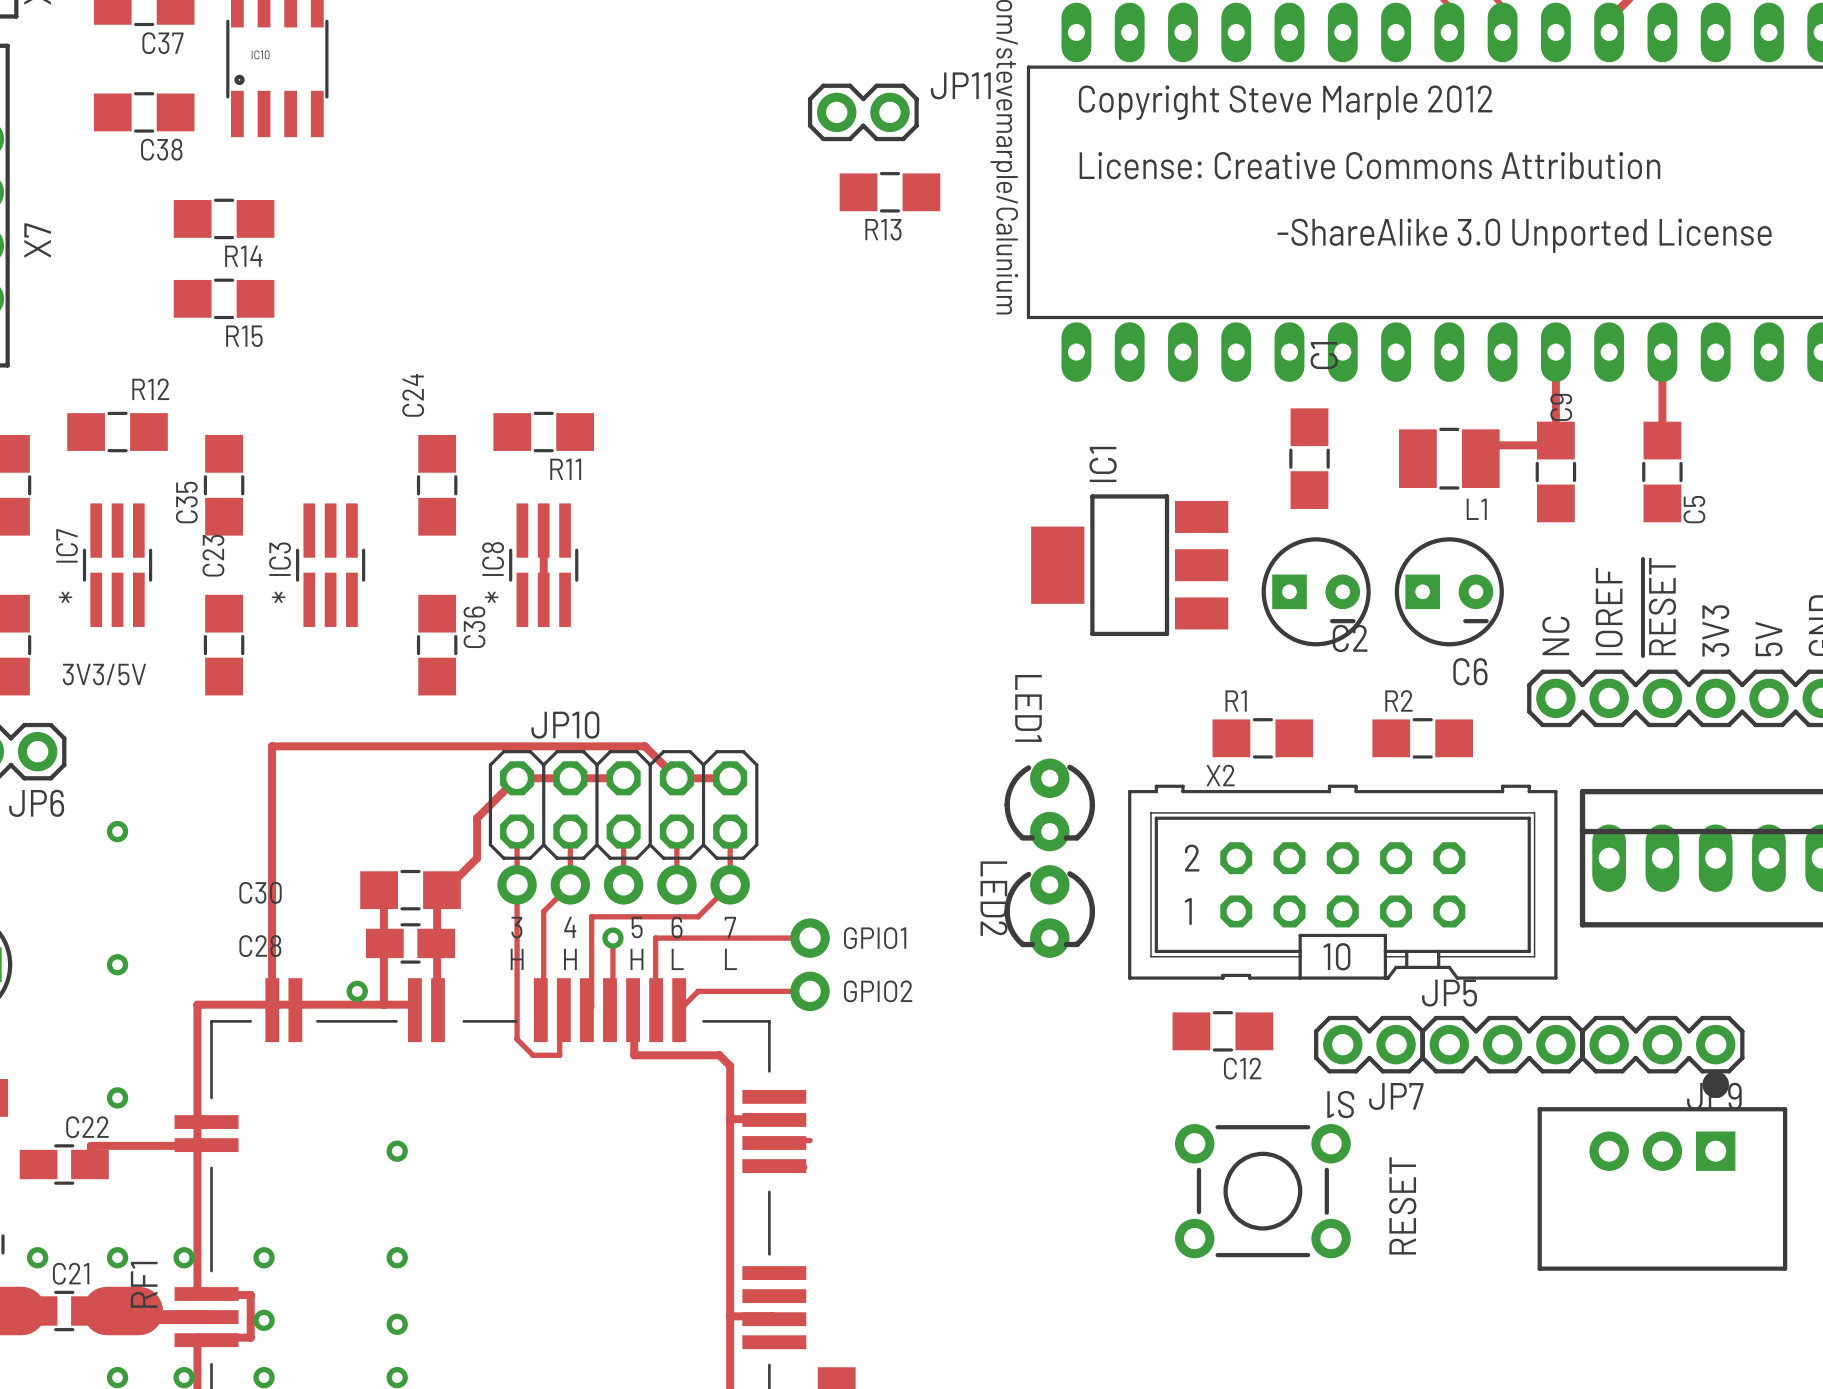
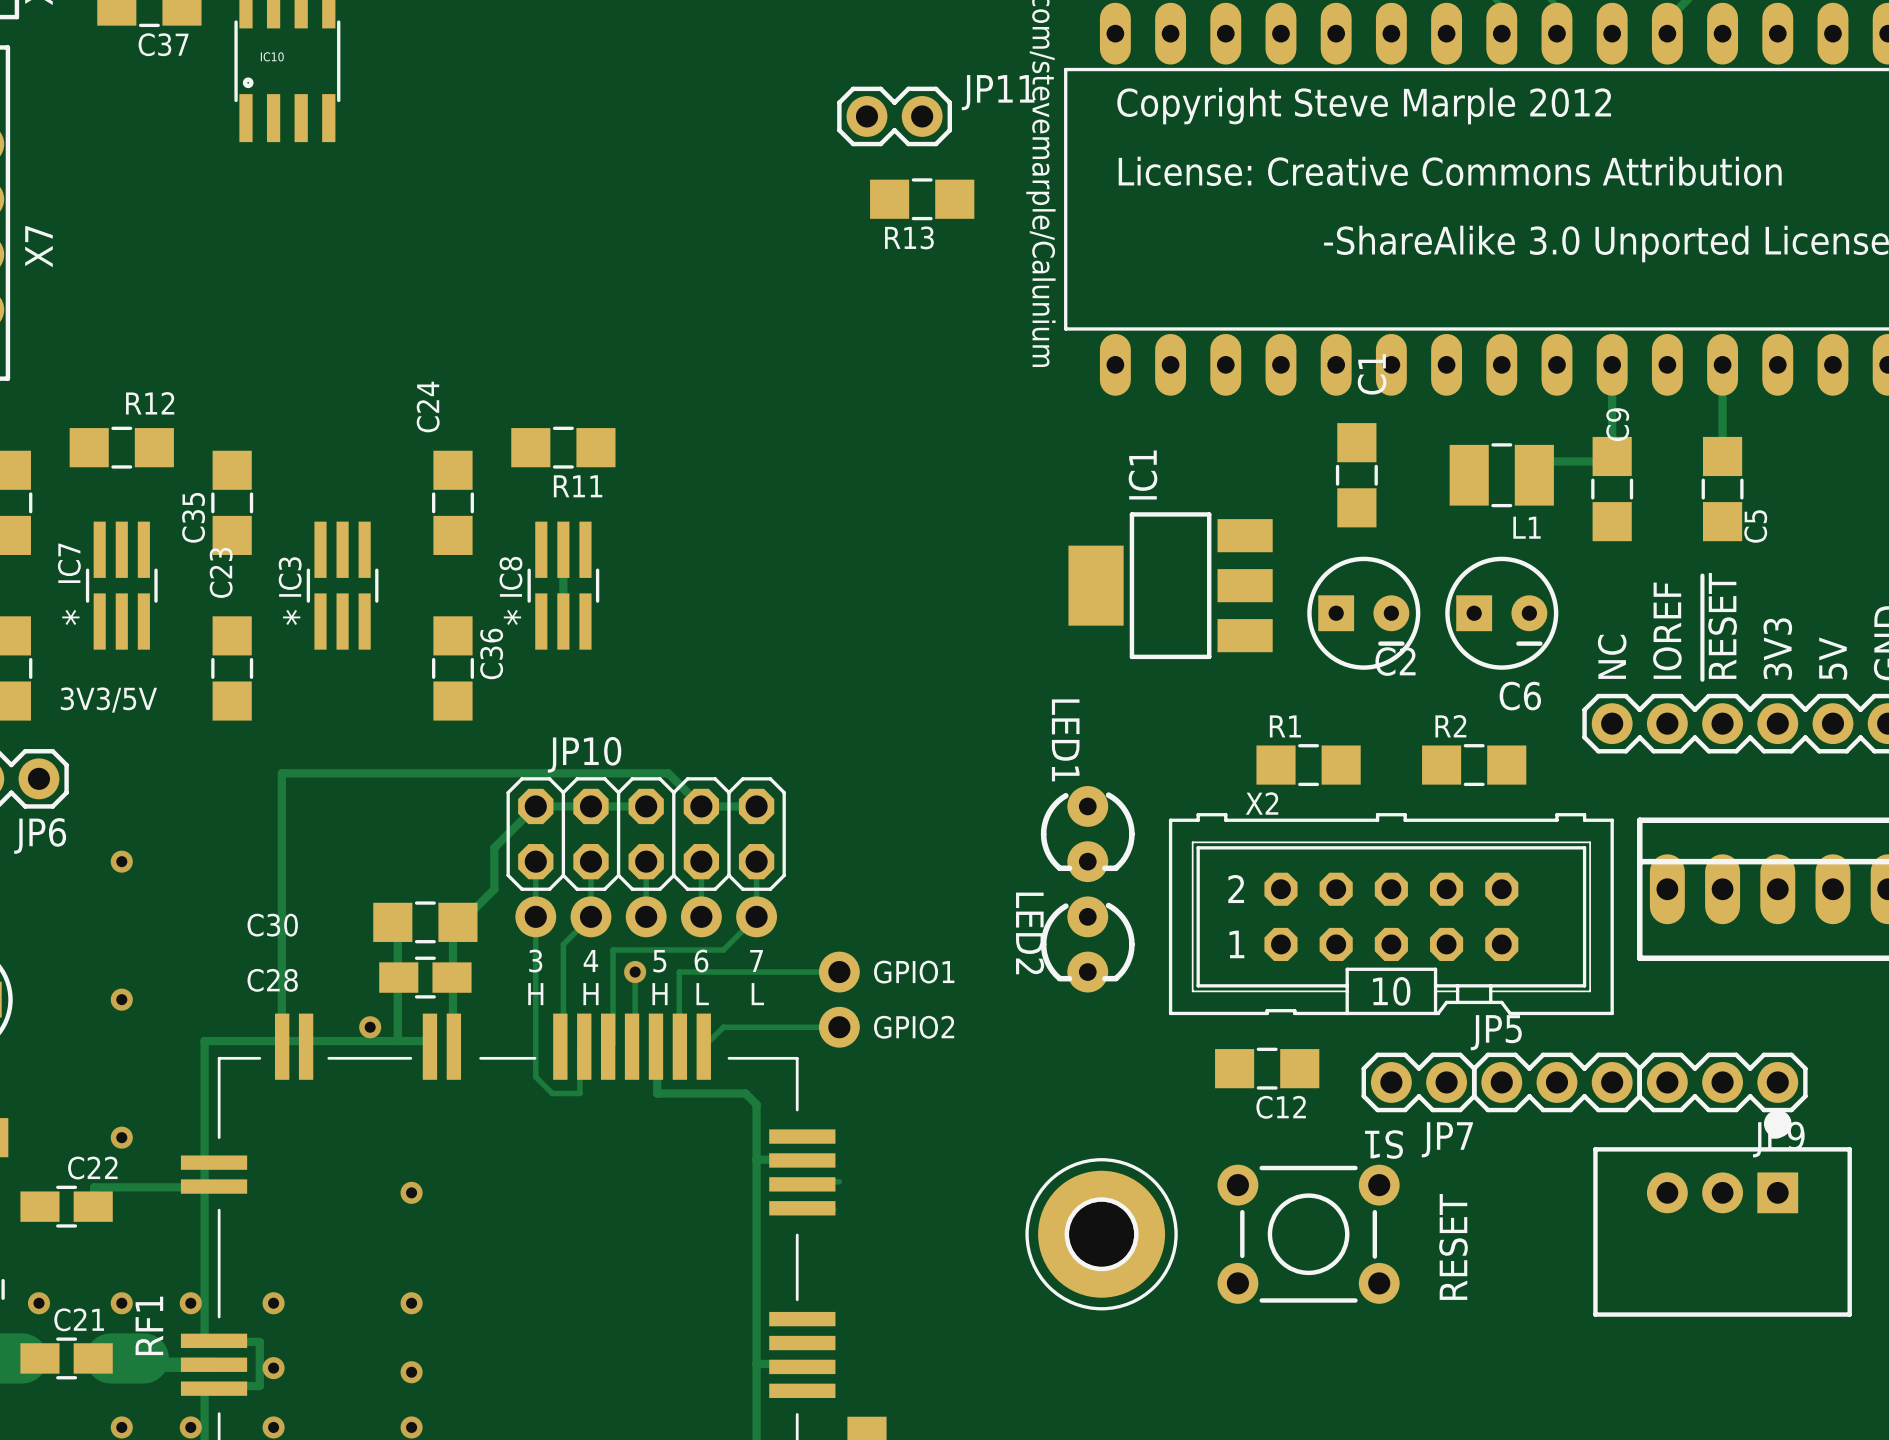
C38: (144, 112) -> none
R14: (224, 218) -> none
R15: (224, 298) -> none
part: none -> (1101, 1234)

